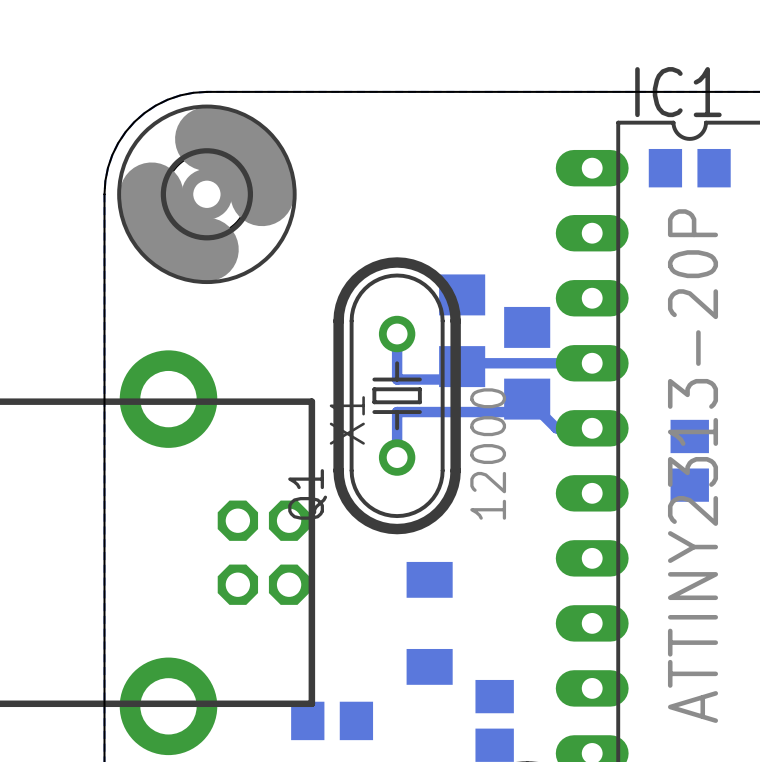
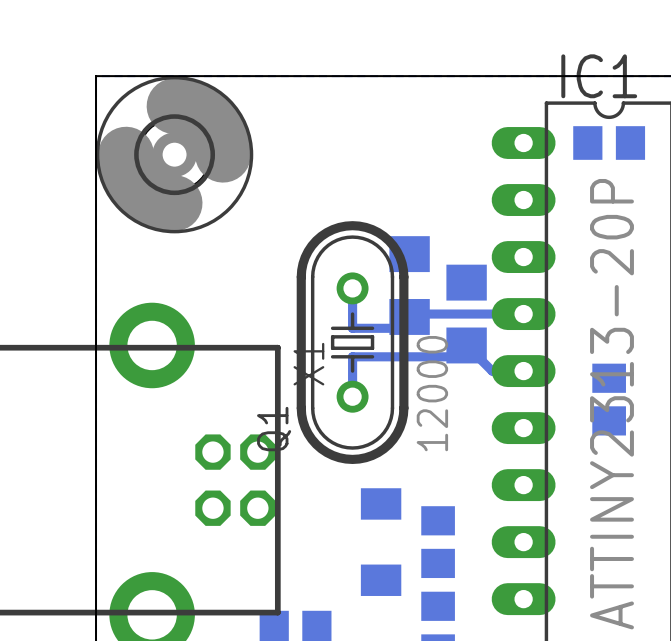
board edge: (206, 91) (193, 92) (167, 99) (155, 105) (134, 121) (118, 143) (112, 155) (105, 180) (104, 194) -> (185, 76) (96, 76) (96, 165)
part position: (206, 194) -> (174, 154)
part: none -> (438, 542)

